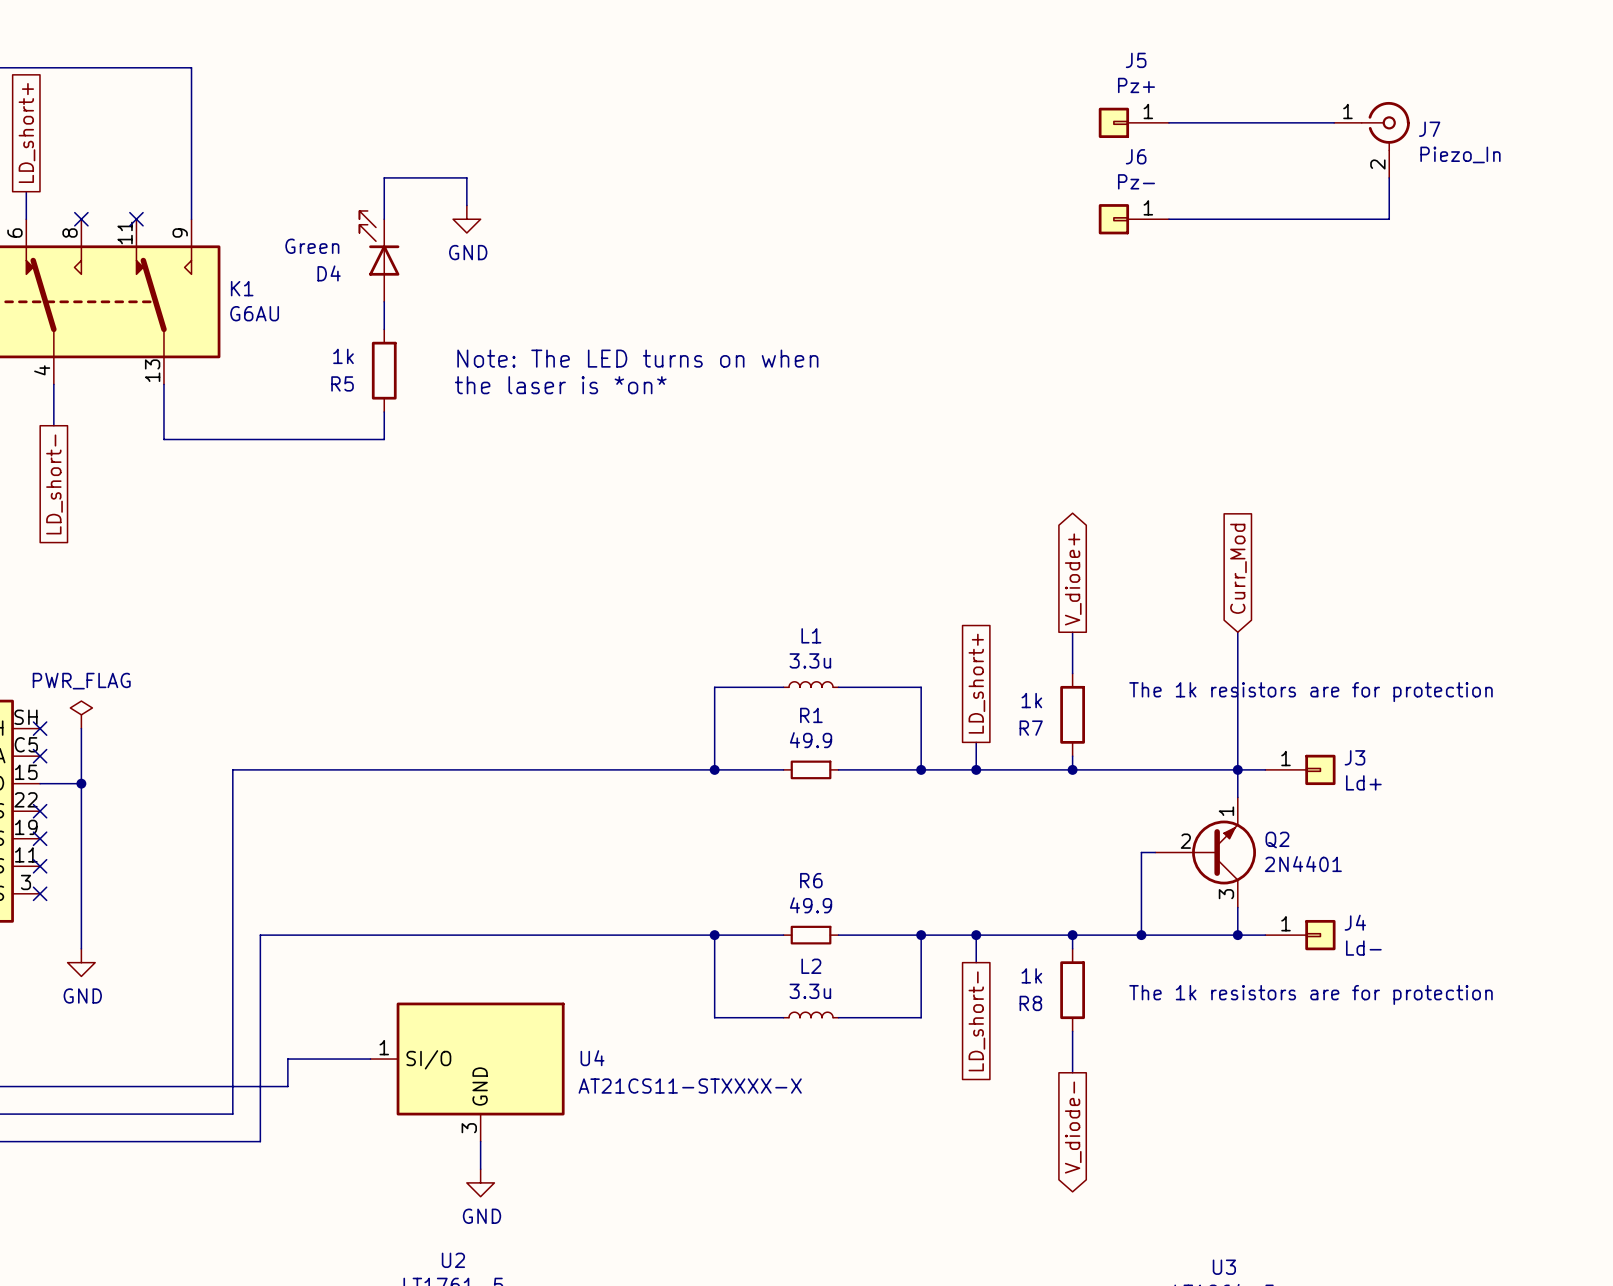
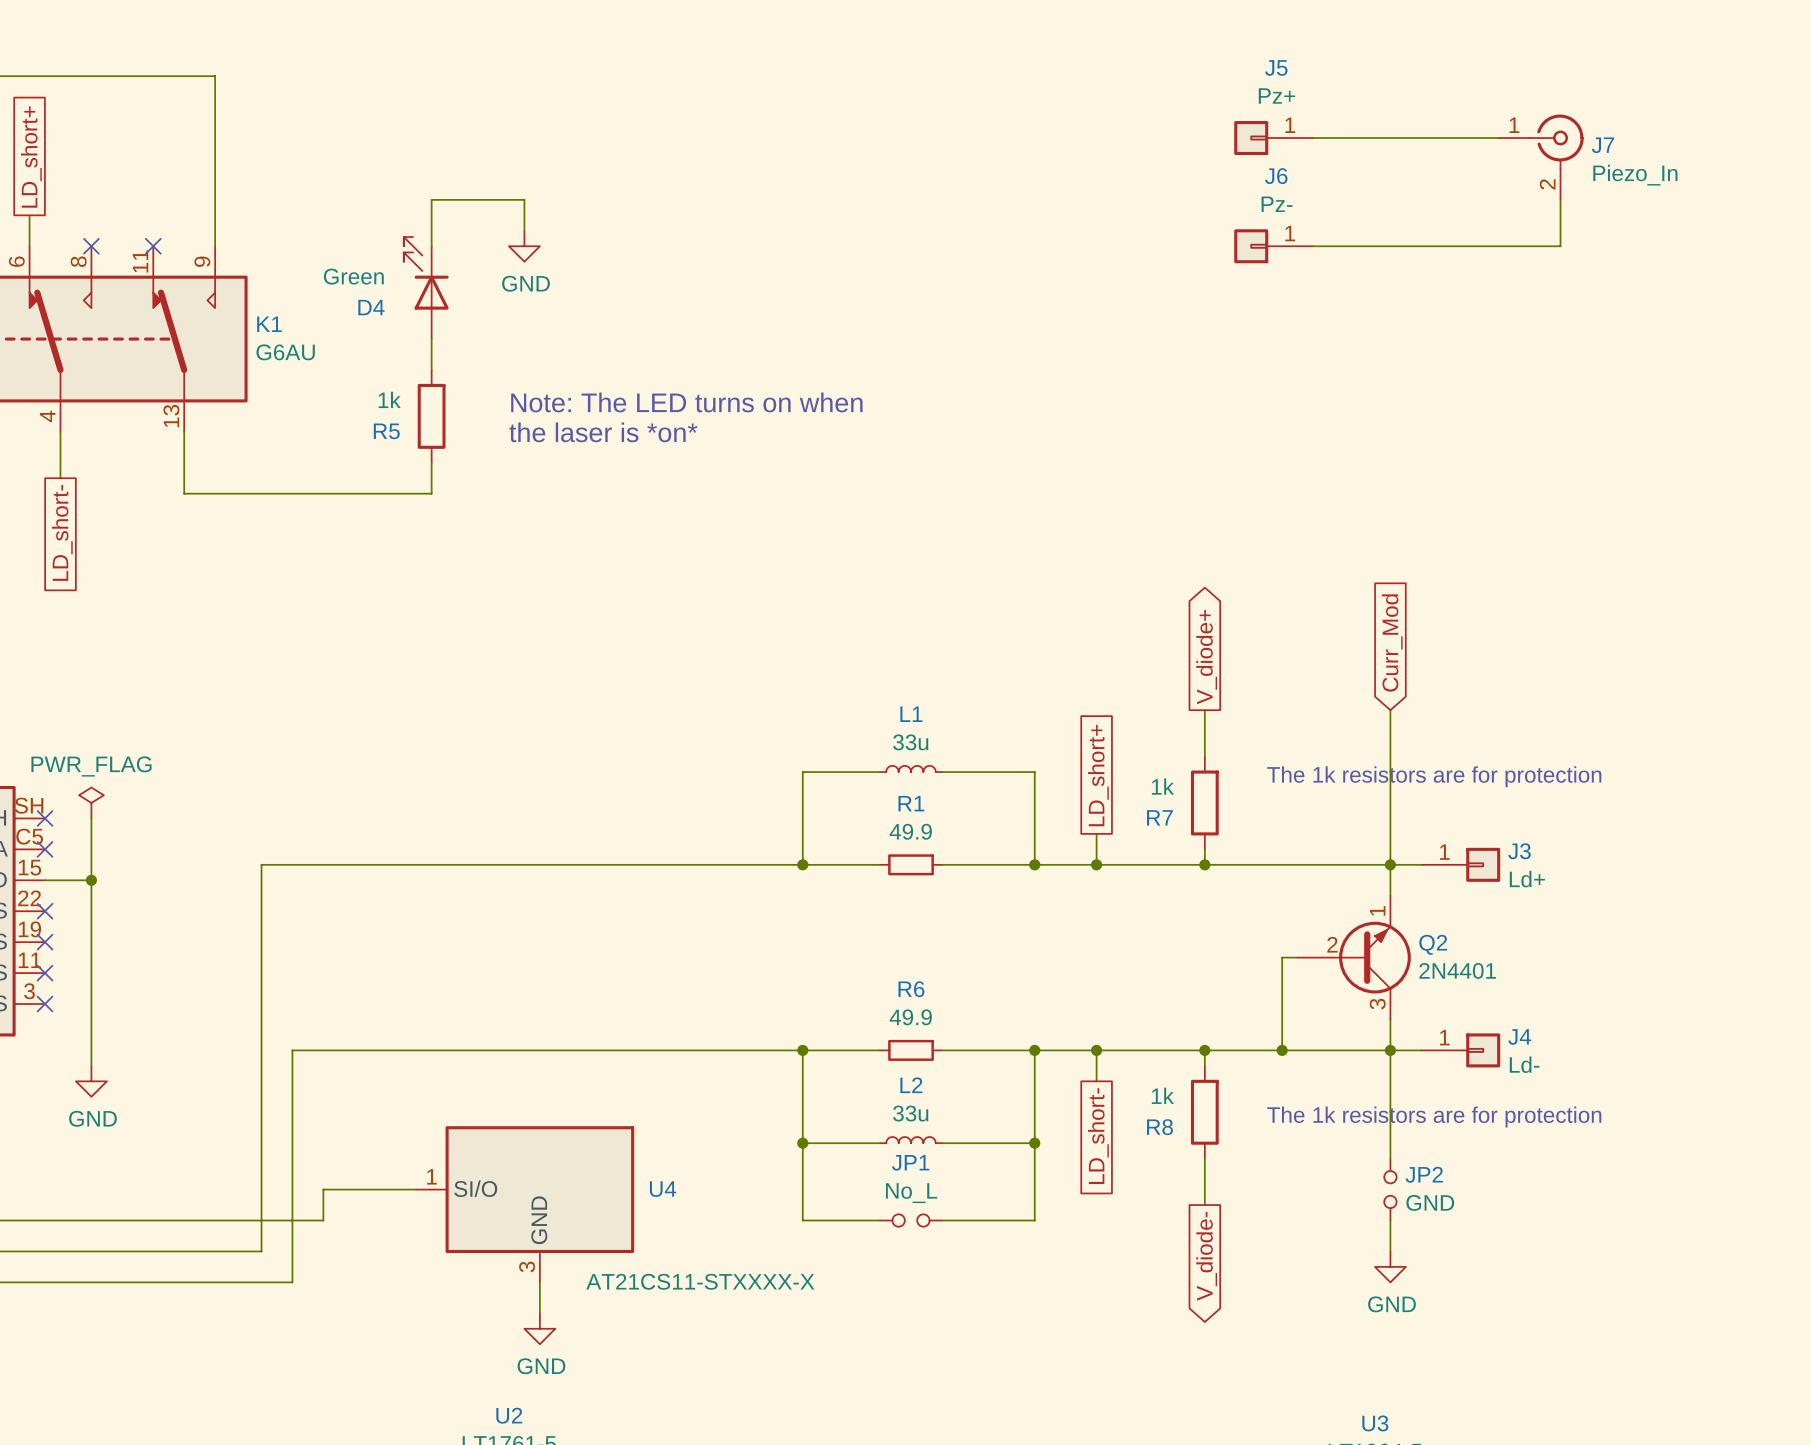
L1 value: 3.3u (810, 660) -> 33u (910, 742)
wire: none -> (1390, 1050) (1390, 1158)
L2 value: 3.3u (810, 991) -> 33u (910, 1113)
wire: none -> (802, 1143) (802, 1220) (880, 1220)
junction: none -> (802, 1143)
wire: none -> (1034, 1143) (1034, 1220) (941, 1220)
junction: none -> (1034, 1143)
JP2: none -> GND (1390, 1189)
U4 value position: AT21CS11-STXXXX-X (690, 1086) -> AT21CS11-STXXXX-X (700, 1281)
JP1: none -> No_L (911, 1220)
wire: none -> (1390, 1220) (1390, 1251)
power symbol: none -> GND (1390, 1266)

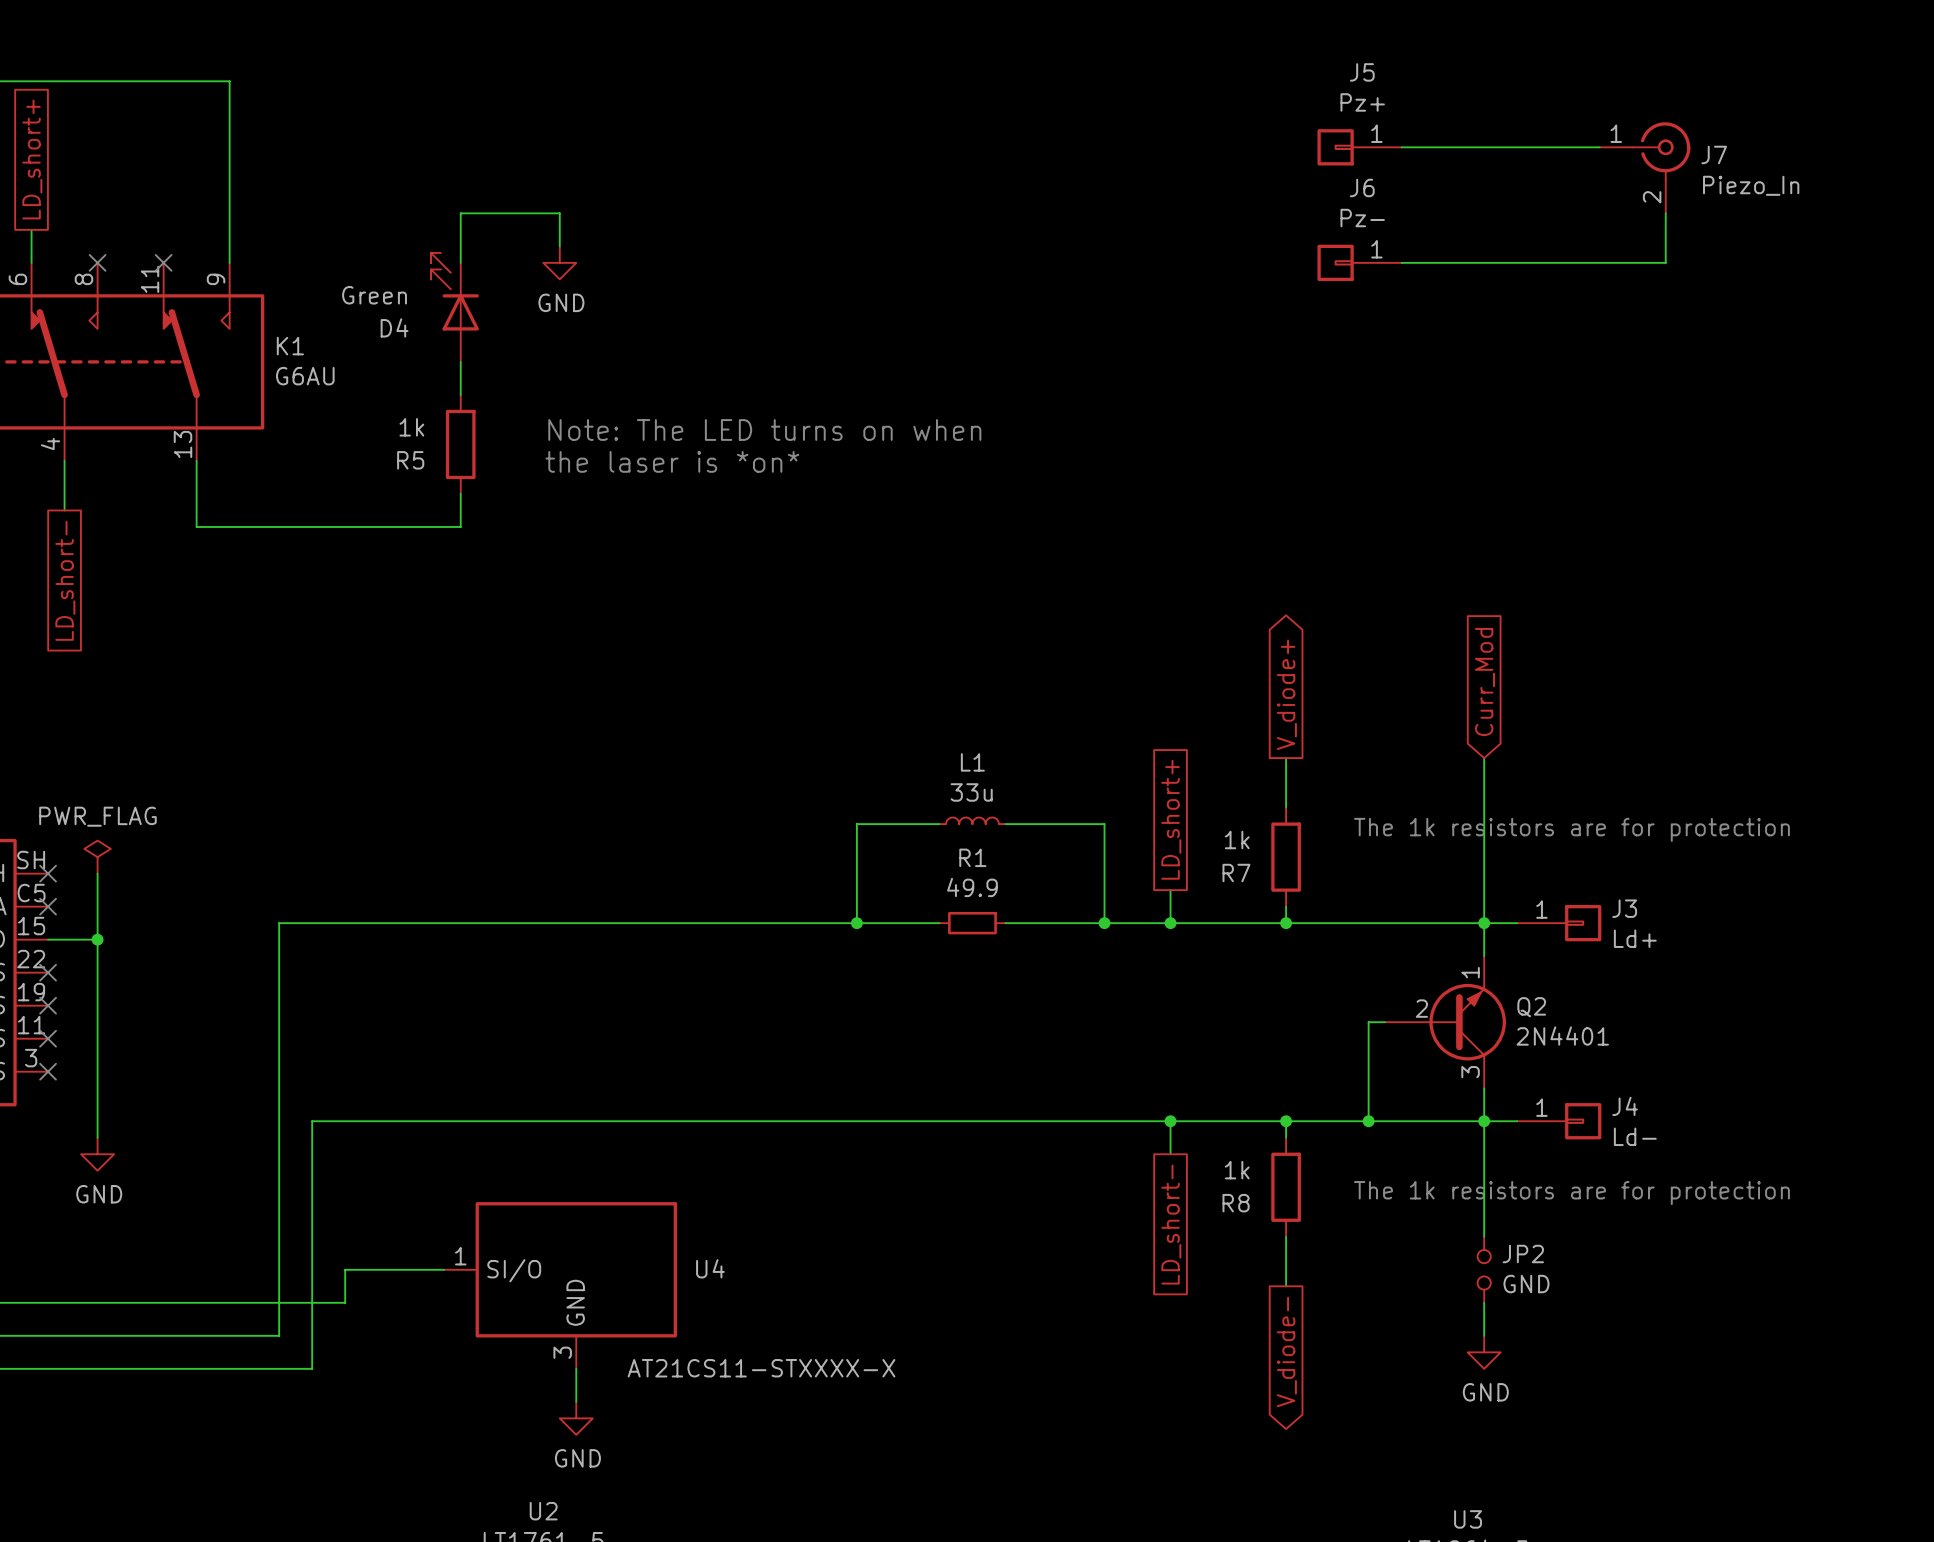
wire: (802, 1050) (802, 1220) (880, 1220) -> none
junction: (802, 1050) -> none
wire: none -> (939, 1121) (1005, 1121)
R6: 49.9 (911, 1050) -> none
wire: (1034, 1050) (1034, 1220) (941, 1220) -> none
junction: (1034, 1050) -> none
L2: 33u (911, 1140) -> none
wire: (802, 1143) (880, 1143) -> none
junction: (802, 1143) -> none
wire: (941, 1143) (1034, 1143) -> none
junction: (1034, 1143) -> none
JP1: No_L (911, 1220) -> none

